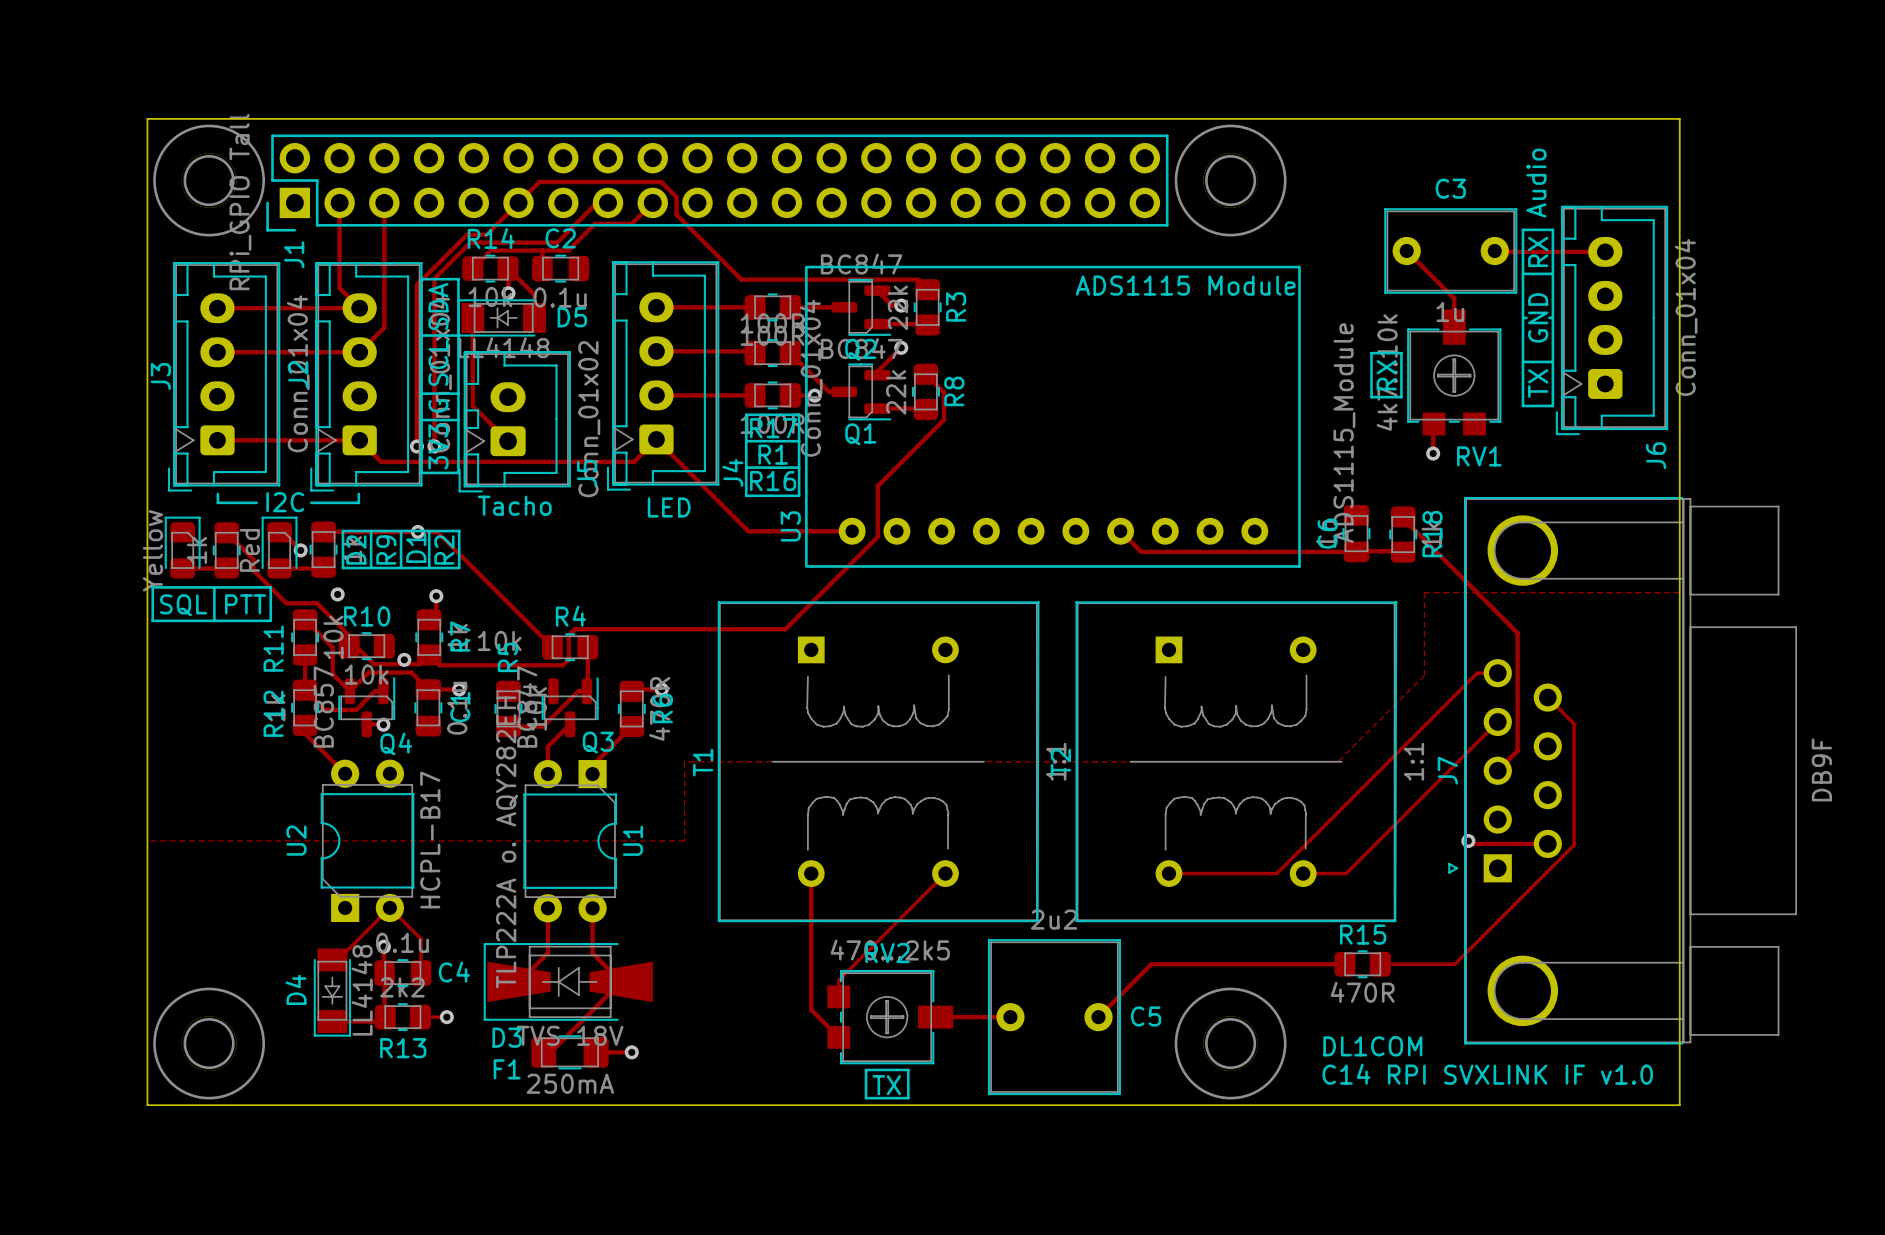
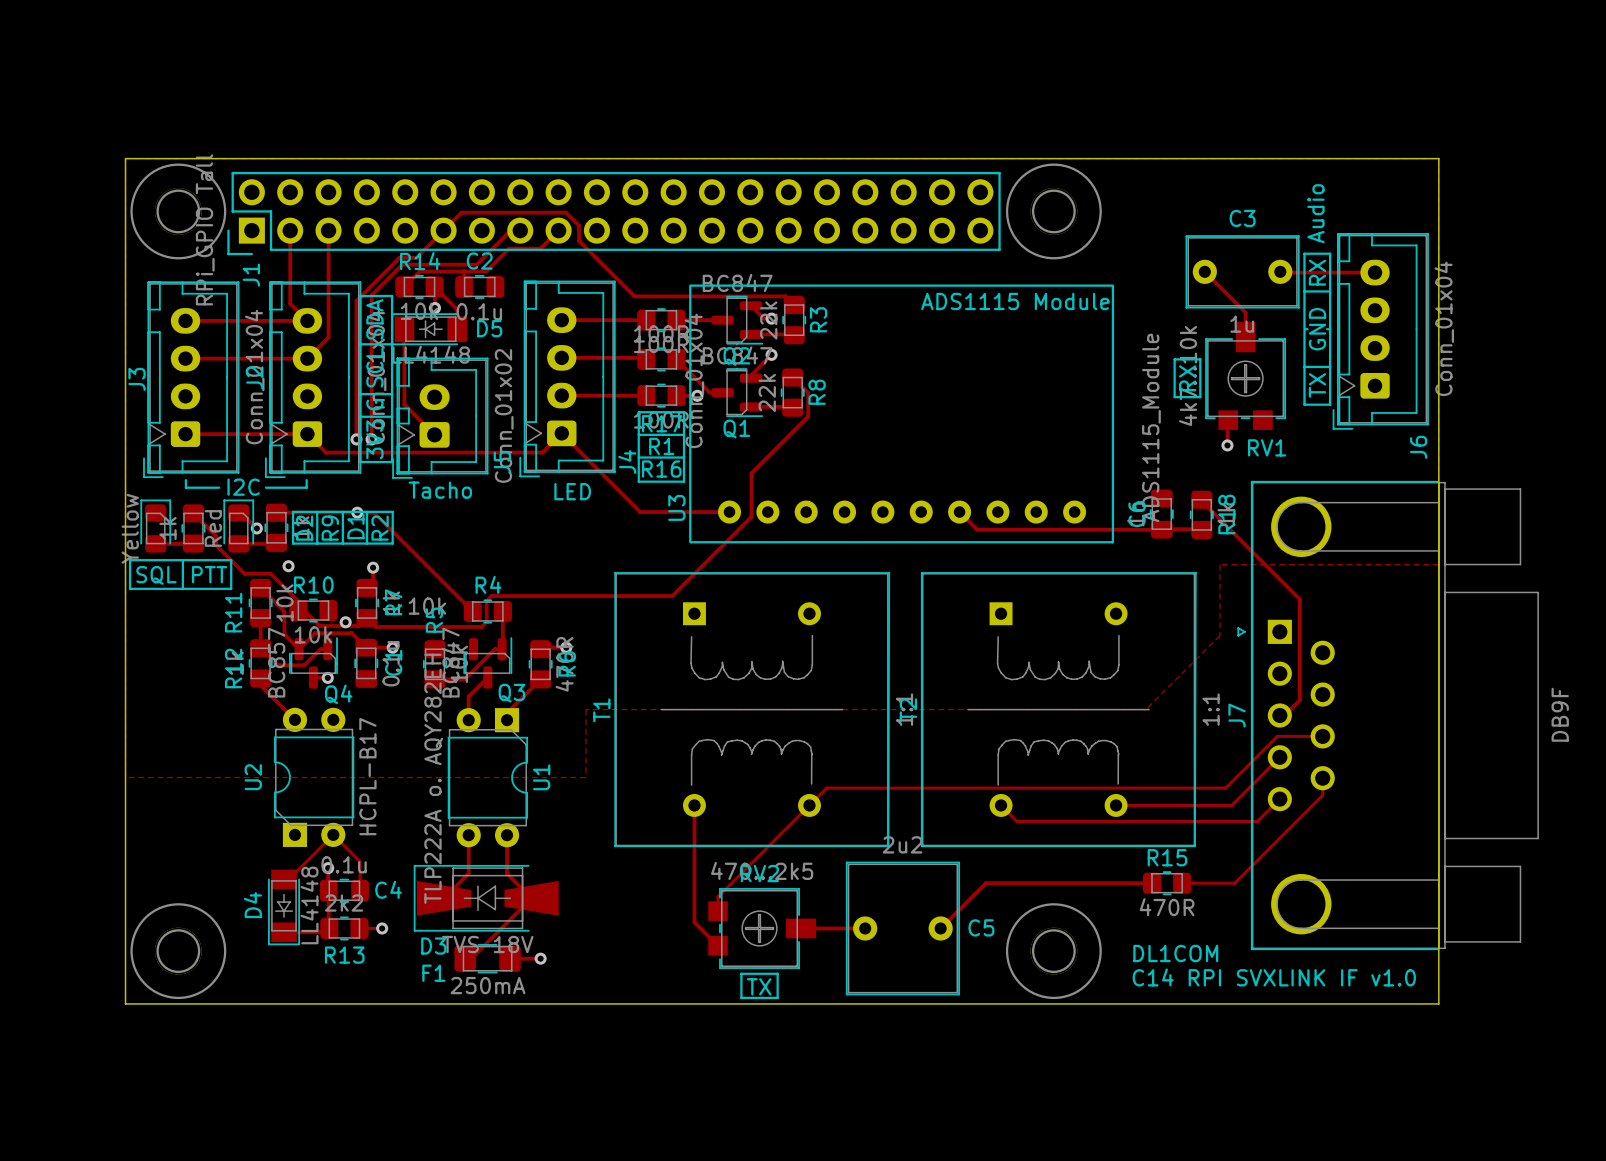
J7 footprint: [1448, 496, 1798, 1045] -> [1237, 480, 1539, 951]
track: (1497, 673) (1477, 673) (1276, 873) (1168, 873) -> (1279, 799) (1257, 821) (1017, 821) (1001, 805)
track: (1547, 697) (1574, 723) (1574, 845) (1454, 964) (1441, 964) -> (1322, 778) (1322, 795) (1234, 883)
track: (1497, 721) (1346, 873) -> (1279, 757) (1231, 805) (1152, 805)
track: none -> (1322, 736) (1277, 736) (1225, 788) (826, 788) (809, 805)
track: (1468, 841) (1471, 843) (1547, 843) -> none
via: (1468, 841) -> none

